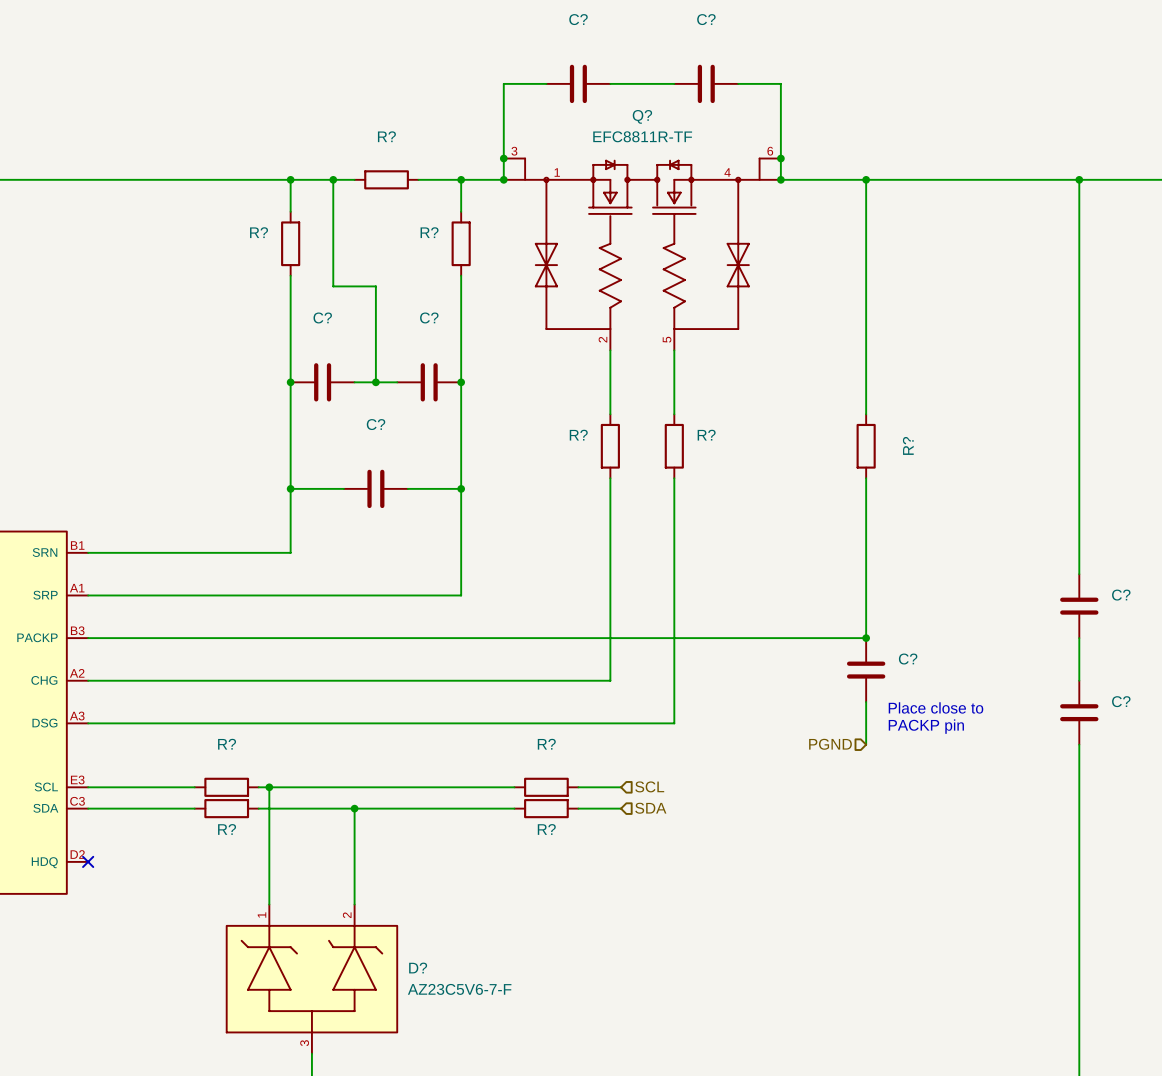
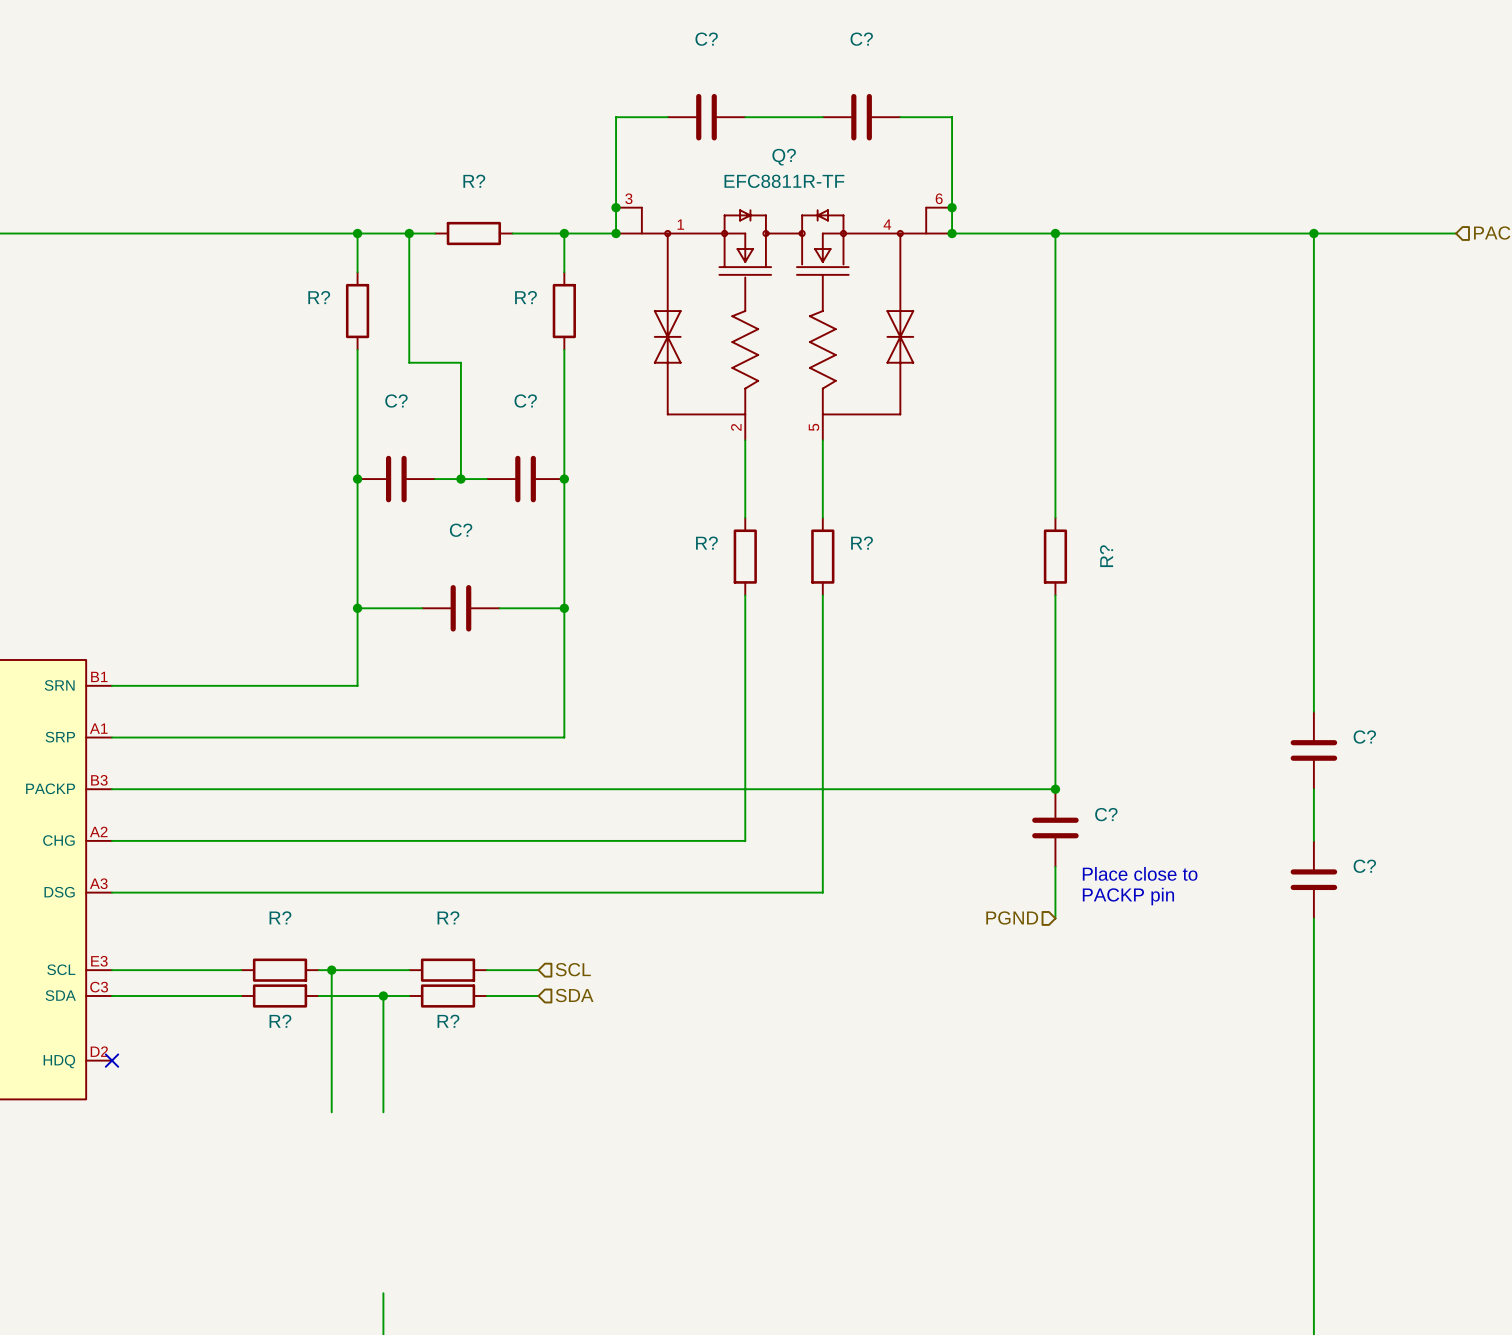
hierarchical label position: SCL (649, 786) -> SCL (573, 969)
wire: (333, 787) (397, 787) -> none
R?: none -> (448, 970)
wire: (439, 787) (514, 787) -> none
R?: (546, 787) -> none
wire: (578, 787) (621, 787) -> none
wire: (333, 808) (397, 808) -> none
wire: (354, 808) (354, 904) -> (383, 996) (383, 1112)
junction position: (354, 808) -> (383, 996)
R?: none -> (448, 996)
wire: (439, 808) (514, 808) -> none
R?: (546, 808) -> none
wire: (578, 808) (621, 808) -> none
hierarchical label position: SDA (650, 808) -> SDA (574, 995)
D?: AZ23C5V6-7-F (311, 979) -> none

